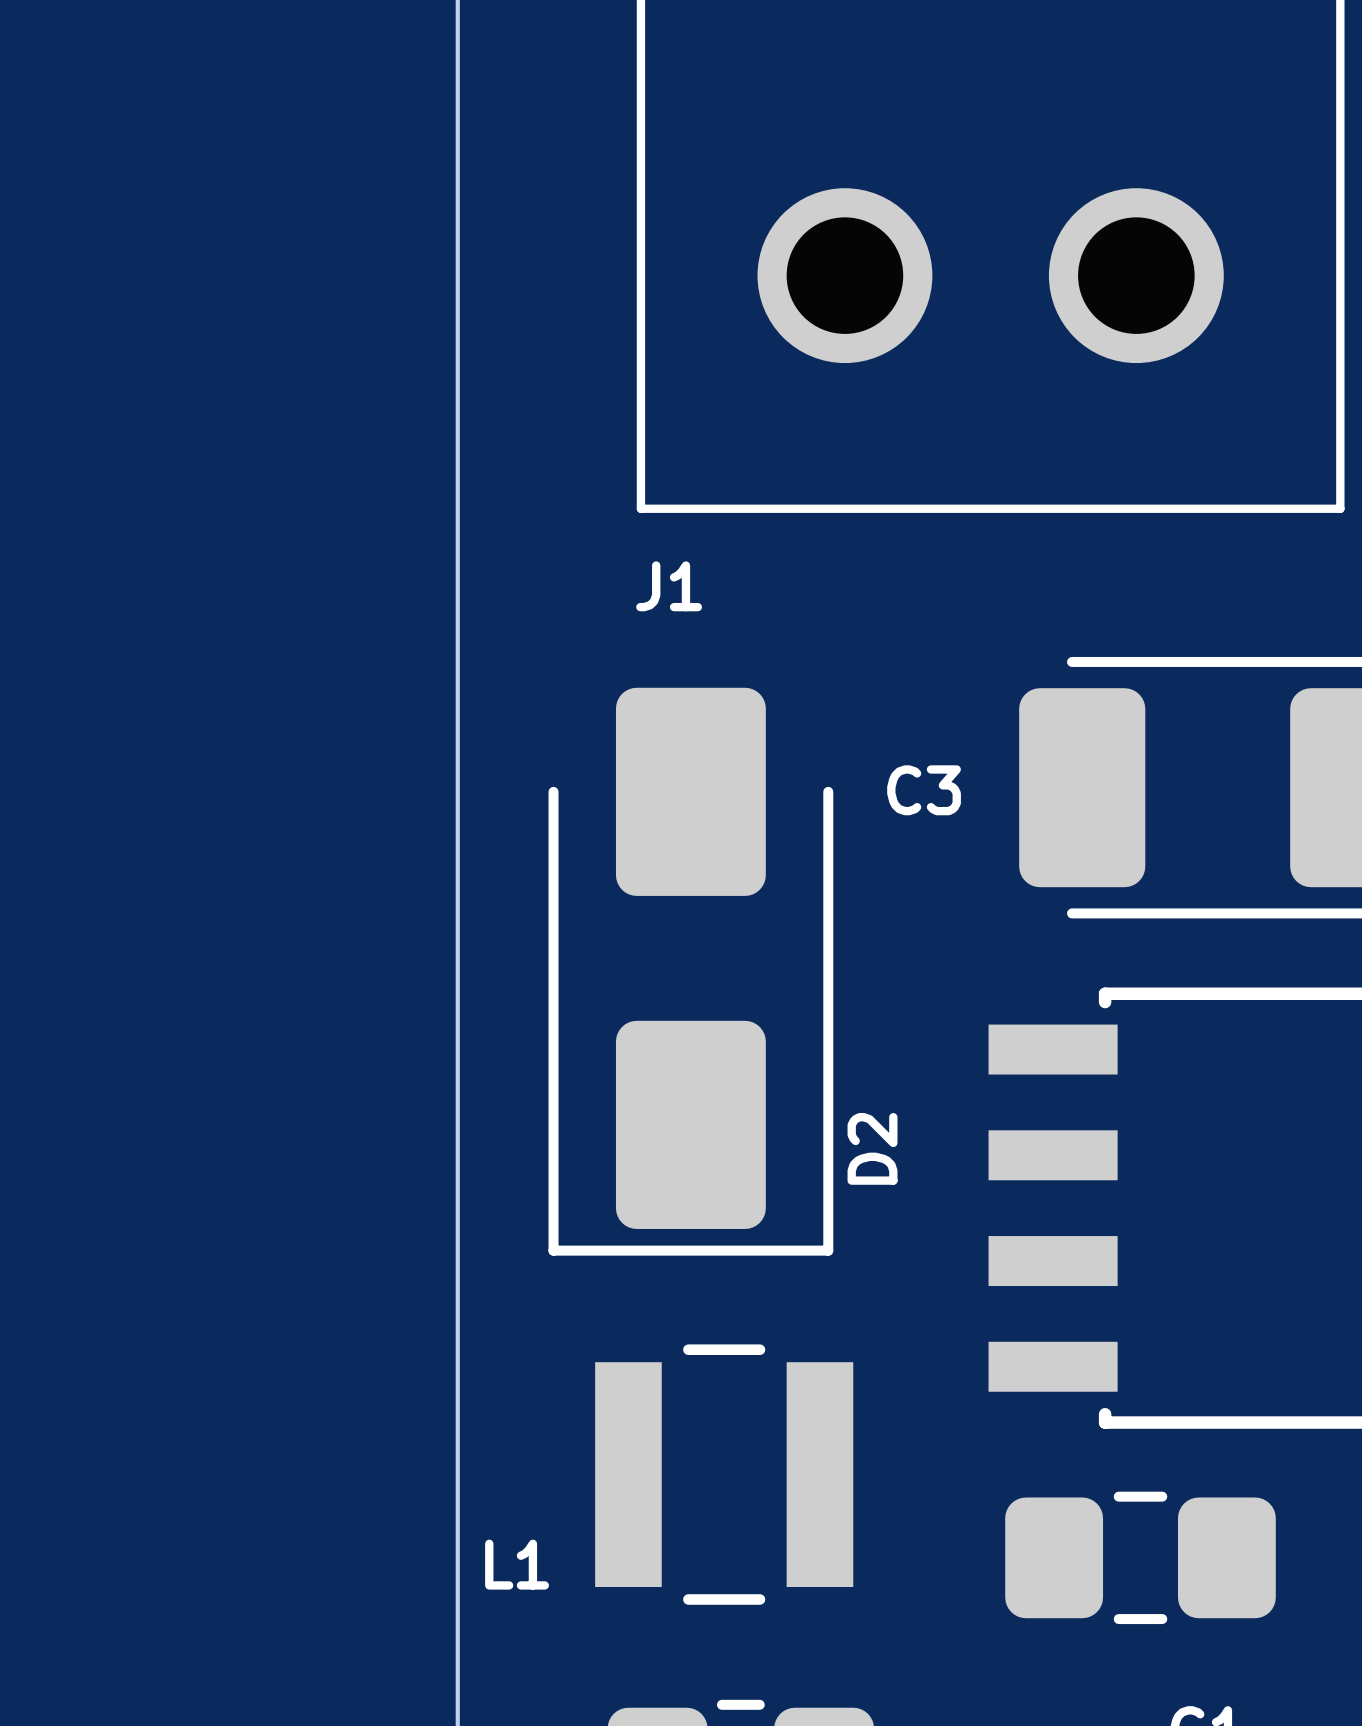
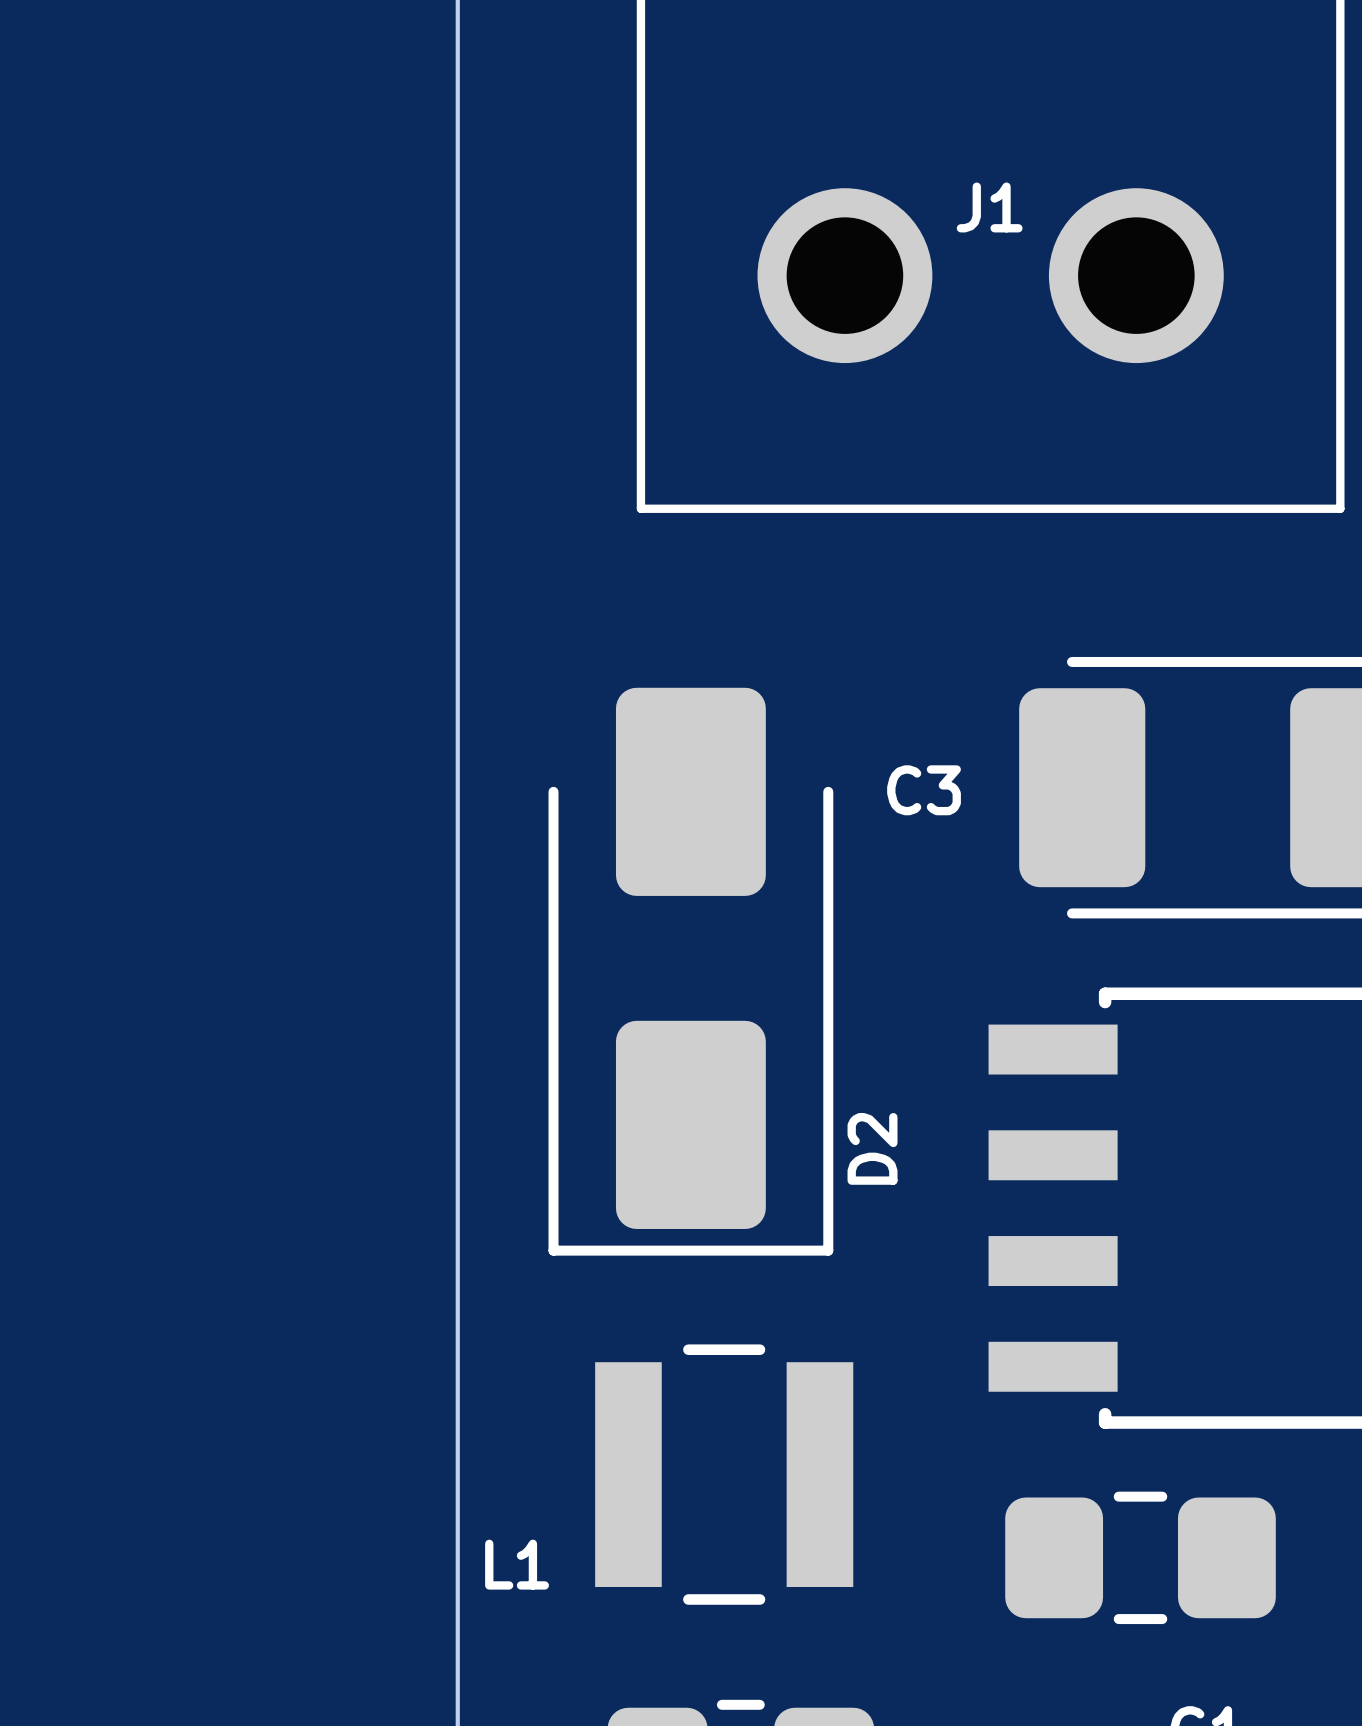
J1 name position: J1 (669, 586) -> J1 (989, 207)

